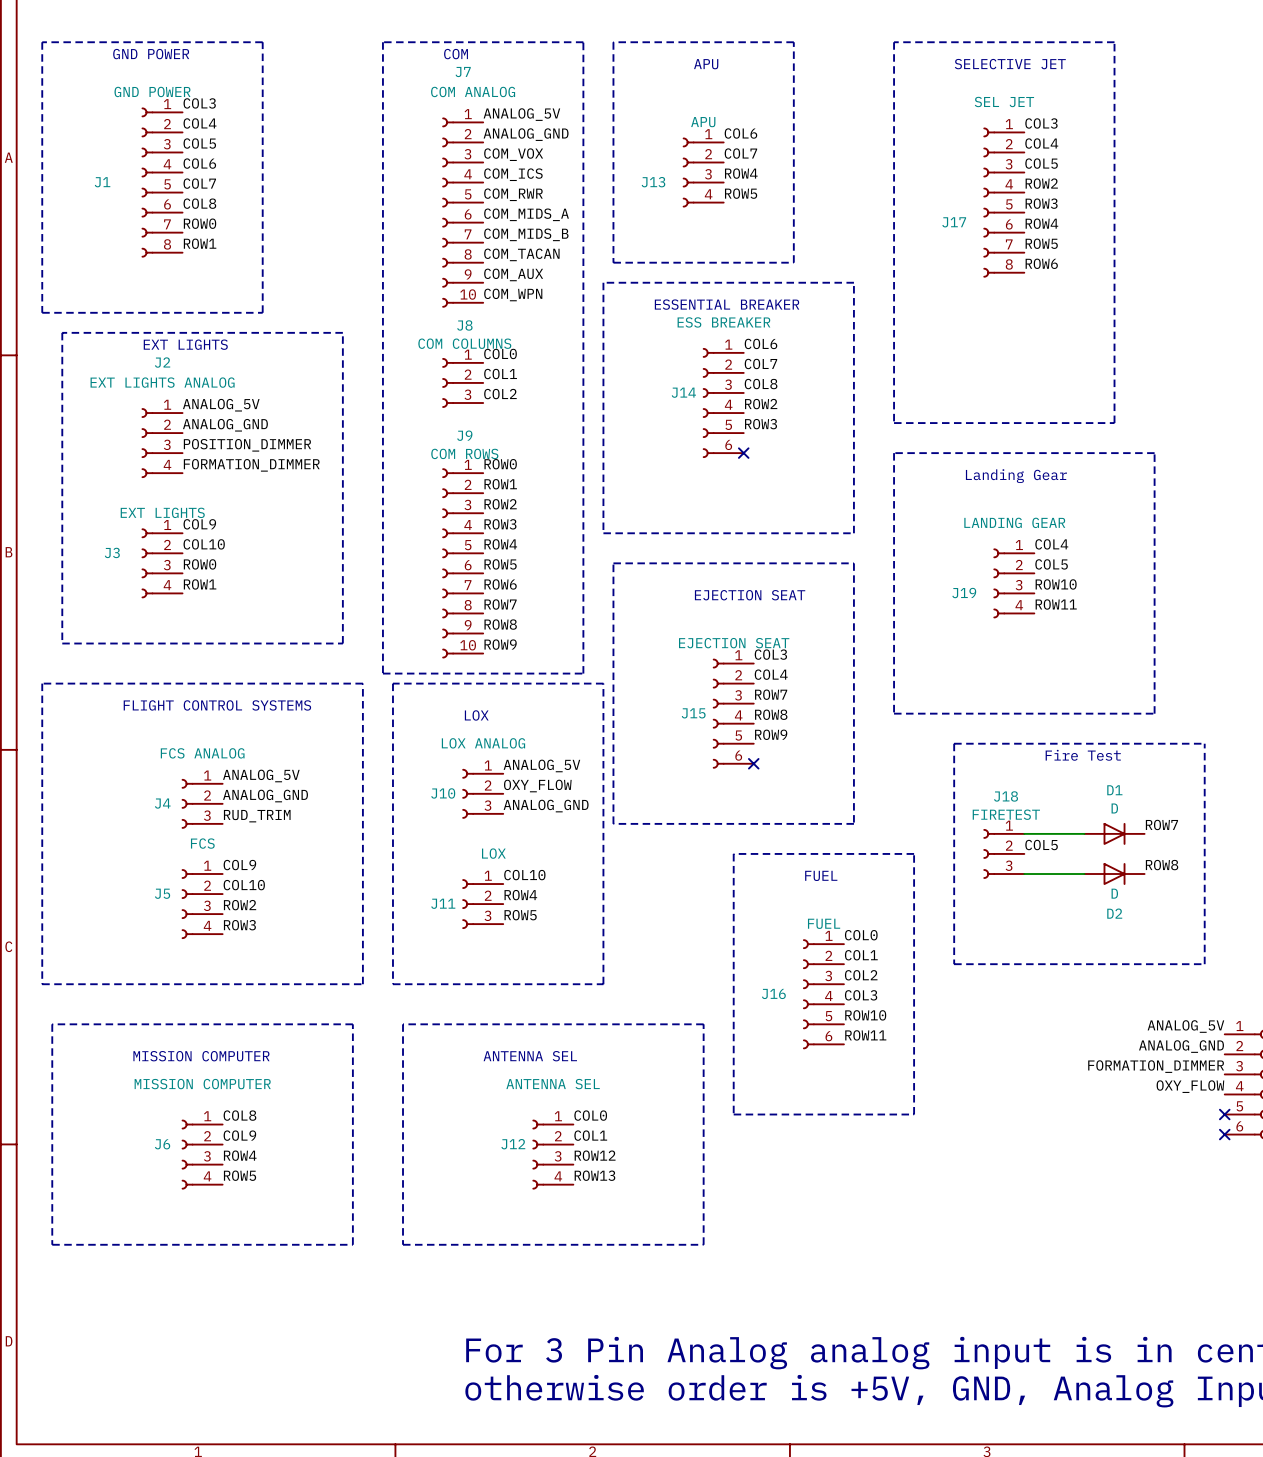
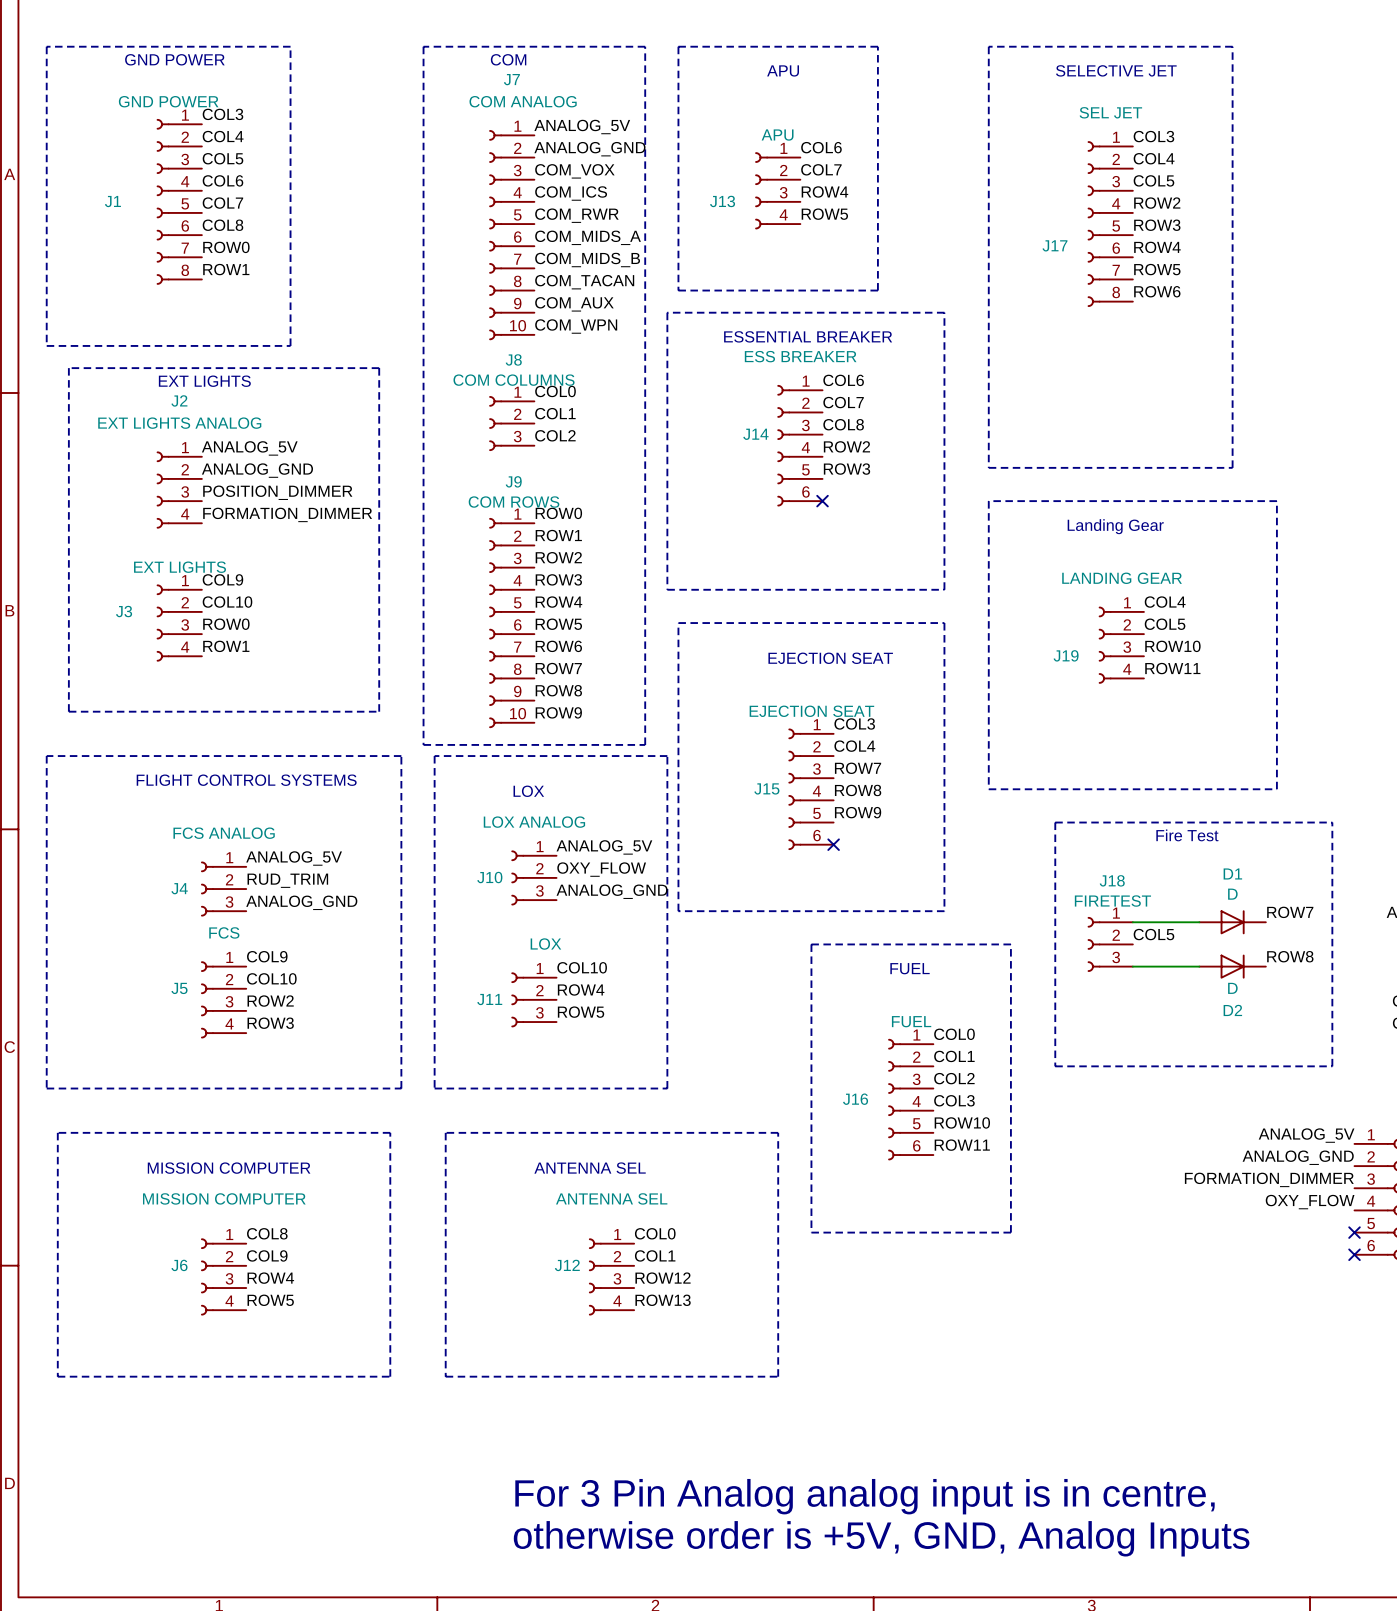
label: ANALOG_GND (265, 796) -> RUD_TRIM (287, 880)
label: RUD_TRIM (257, 816) -> ANALOG_GND (301, 902)

